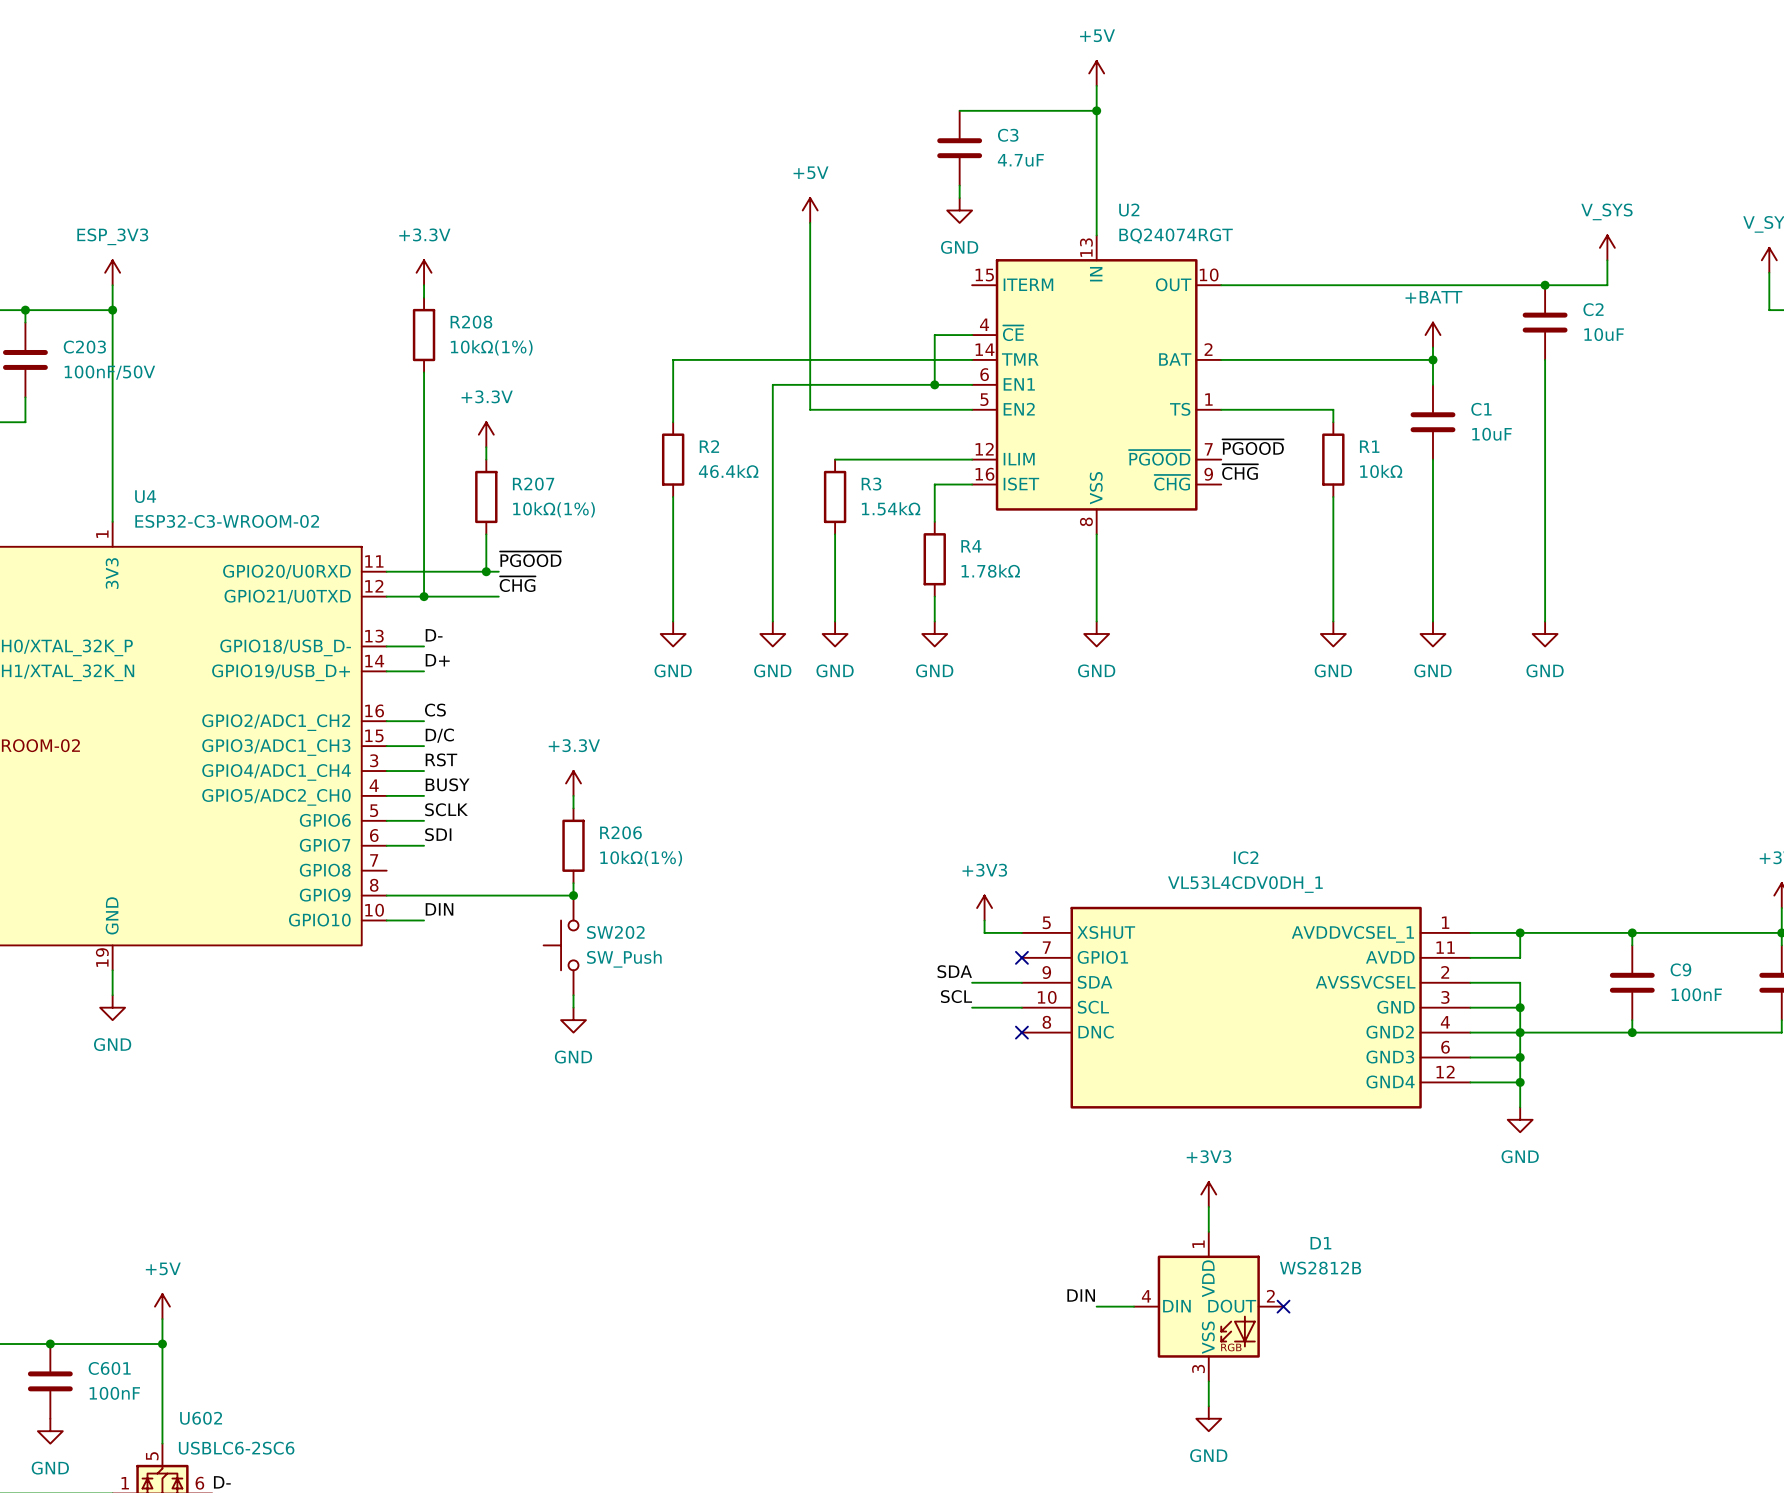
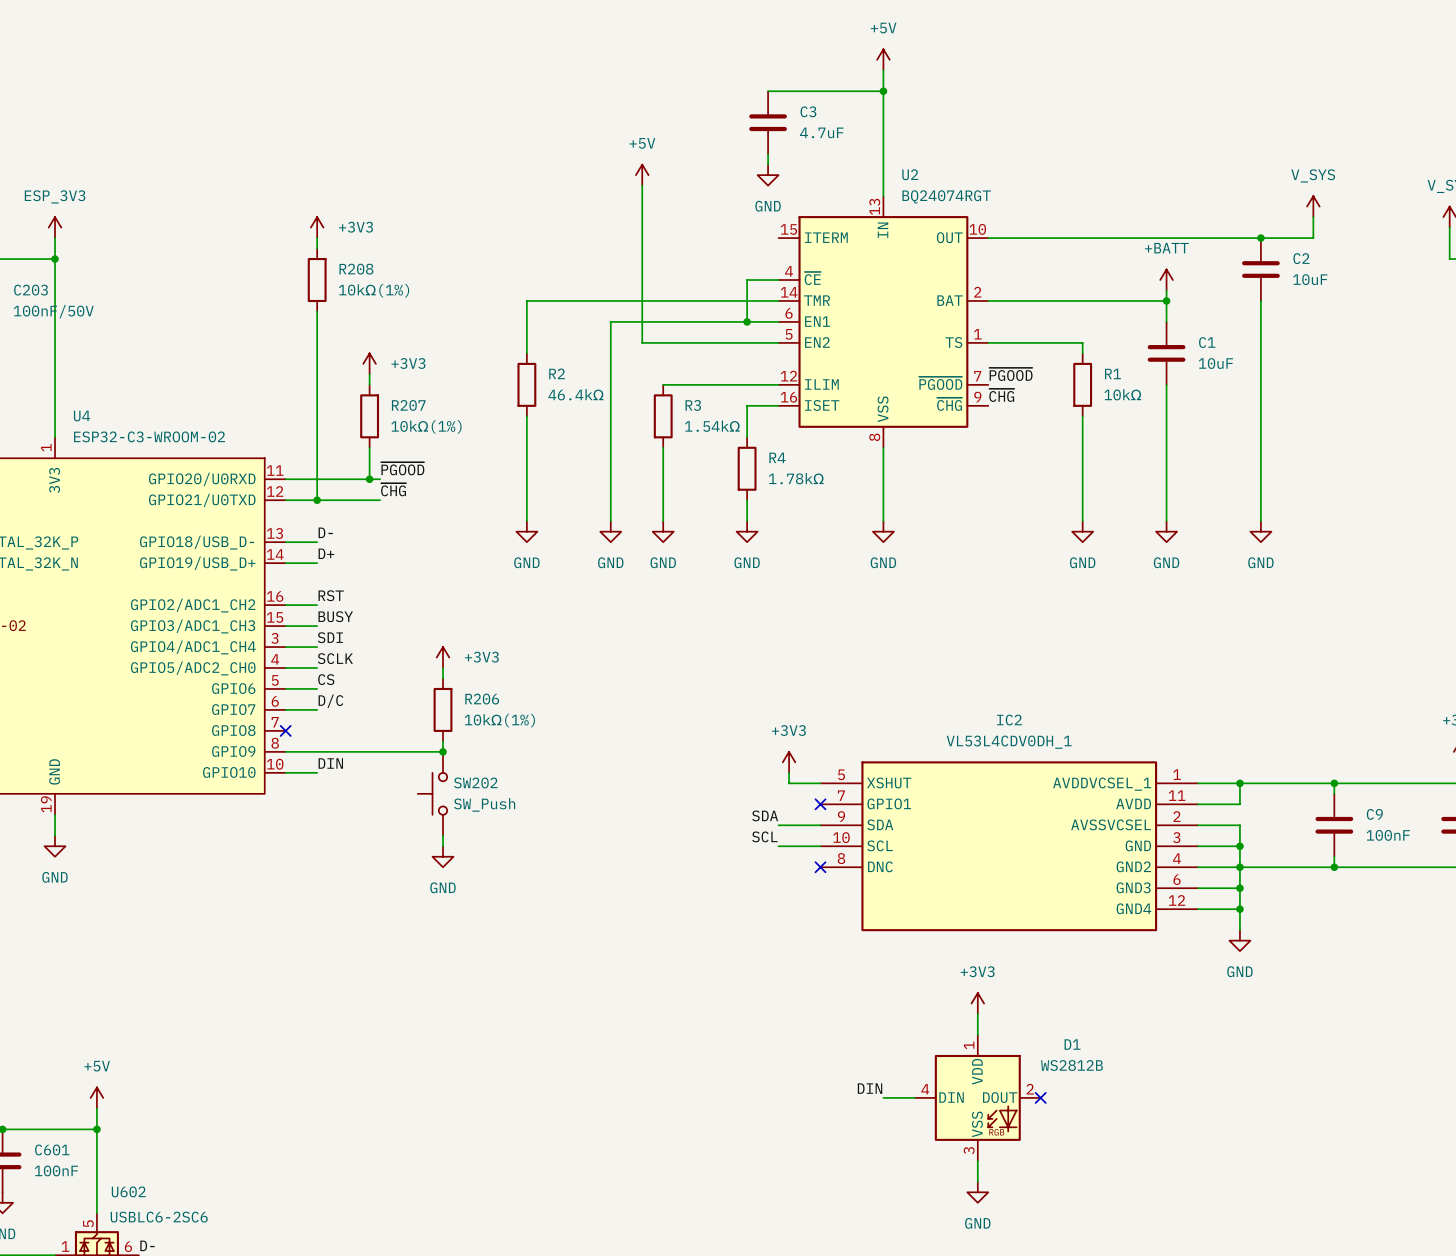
power symbol: +3.3V (424, 272) -> +3V3 (317, 227)
power symbol: +3.3V (486, 434) -> +3V3 (369, 363)
label: CS (435, 710) -> RST (331, 595)
label: D/C (439, 735) -> BUSY (335, 616)
label: RST (441, 759) -> SDI (330, 637)
power symbol: +3.3V (573, 783) -> +3V3 (443, 657)
label: BUSY (447, 784) -> SCLK (335, 658)
label: SCLK (446, 809) -> CS (326, 679)
label: SDI (438, 834) -> D/C (330, 701)
no-connect mark: none -> (285, 730)

